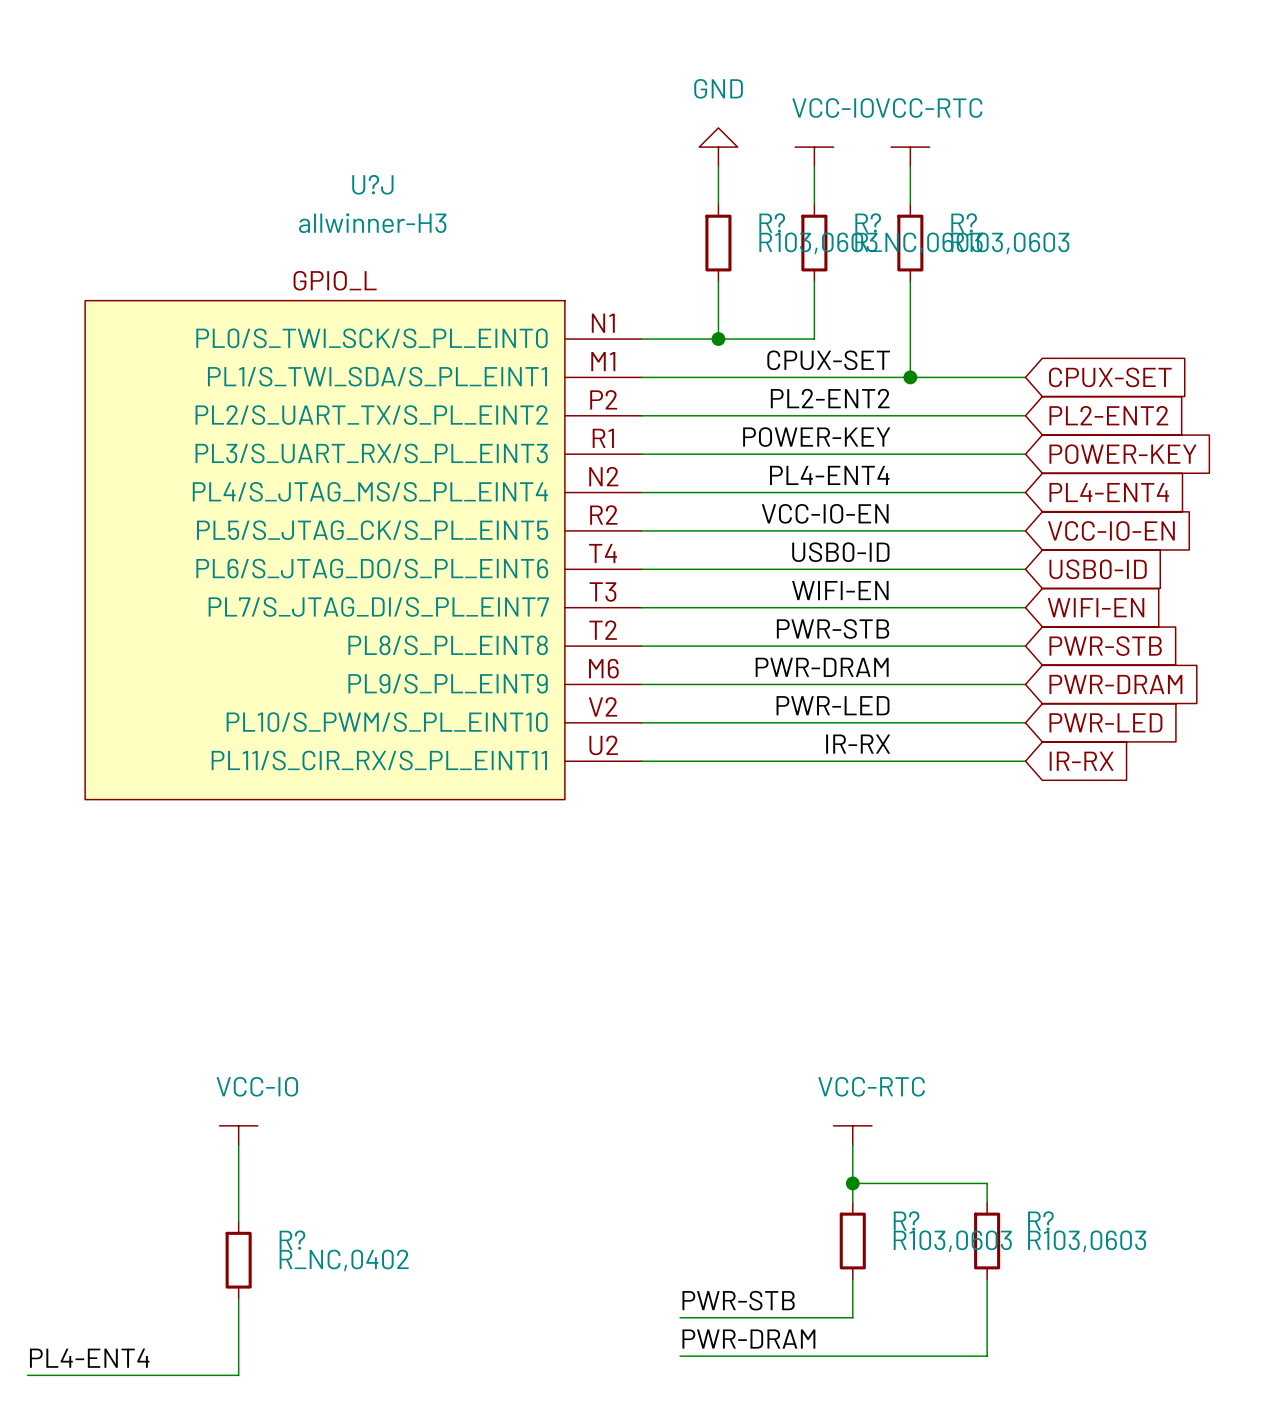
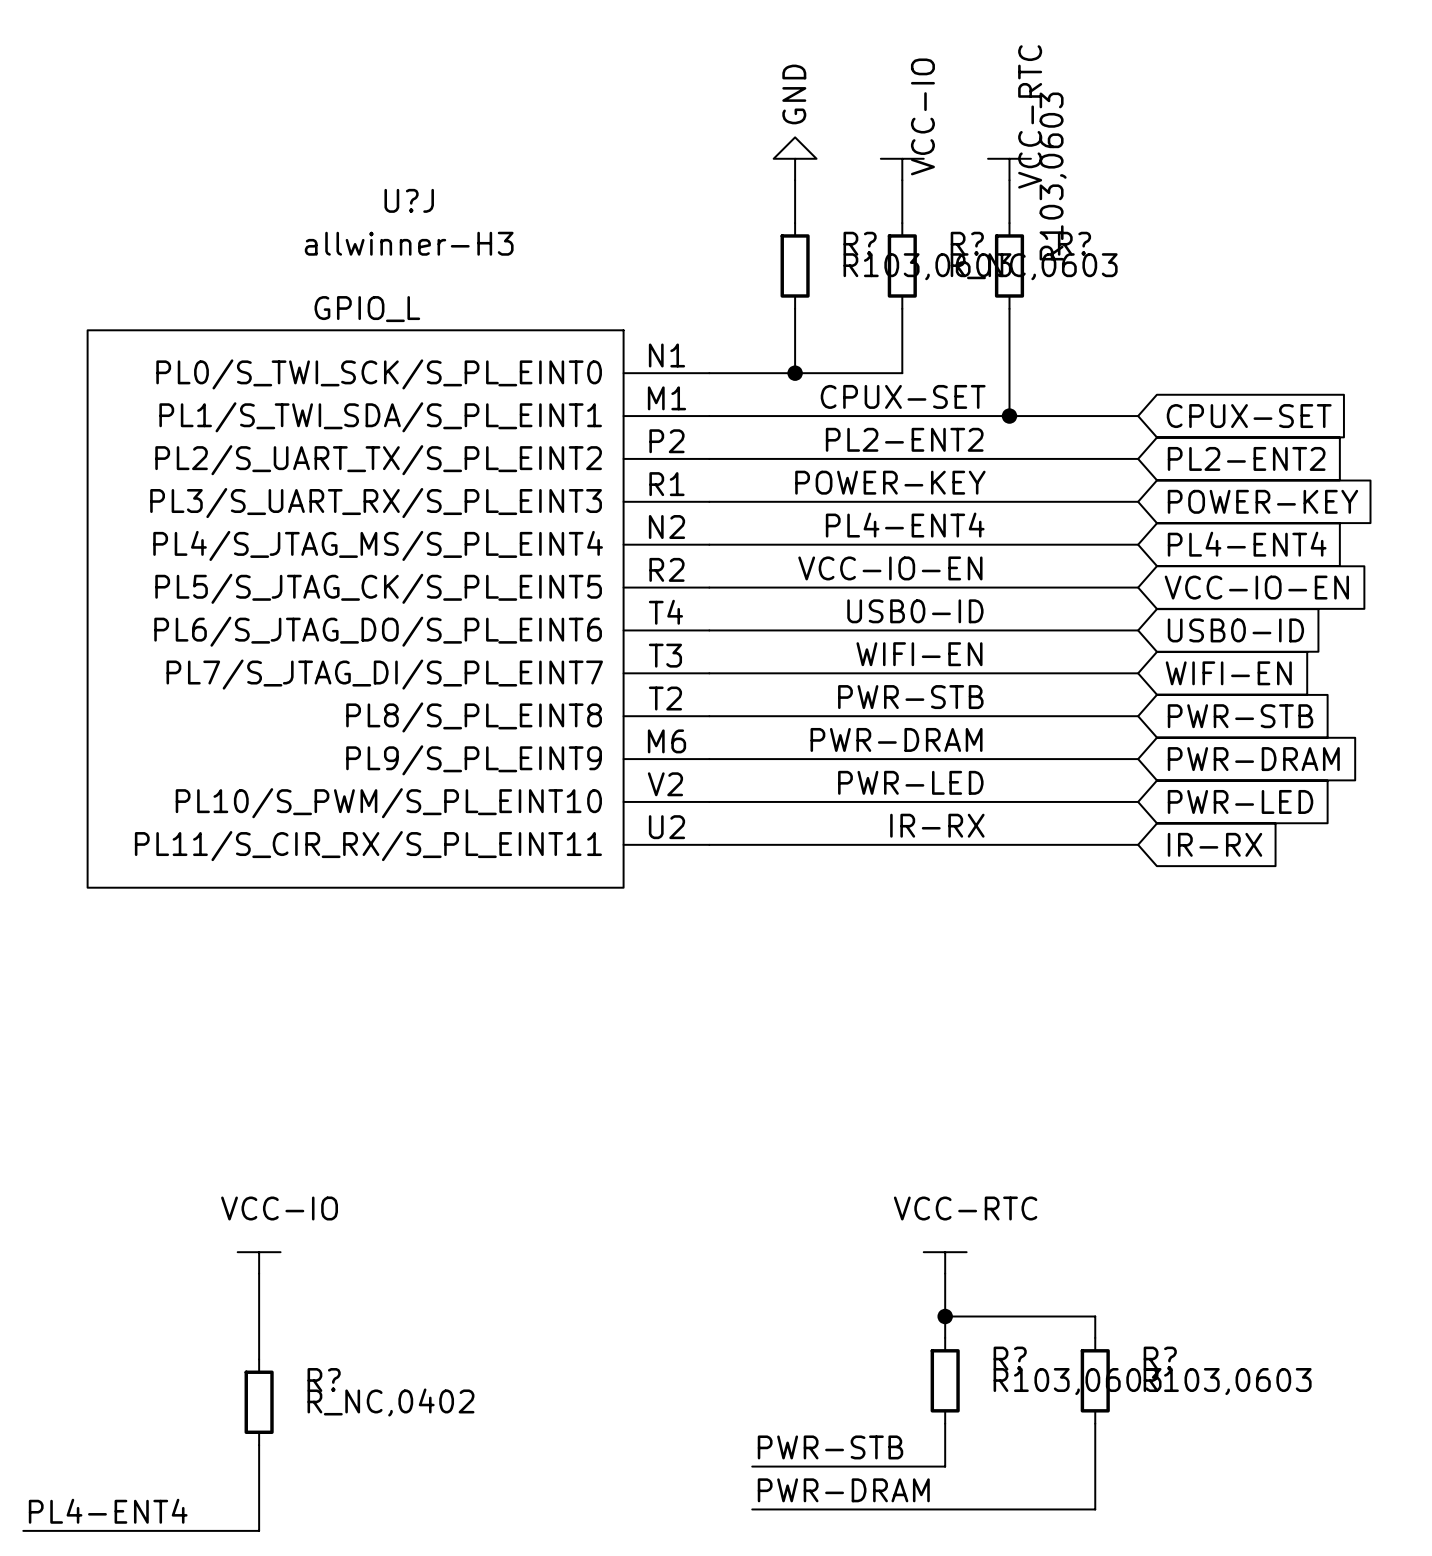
power symbol text rotation: 0° (718, 88) -> 90° counterclockwise (794, 94)
power symbol text rotation: 0° (833, 108) -> 90° counterclockwise (922, 116)
power symbol text rotation: 0° (929, 108) -> 90° counterclockwise (1030, 116)
R? value rotation: 0° (1010, 243) -> 90° counterclockwise (1053, 176)

